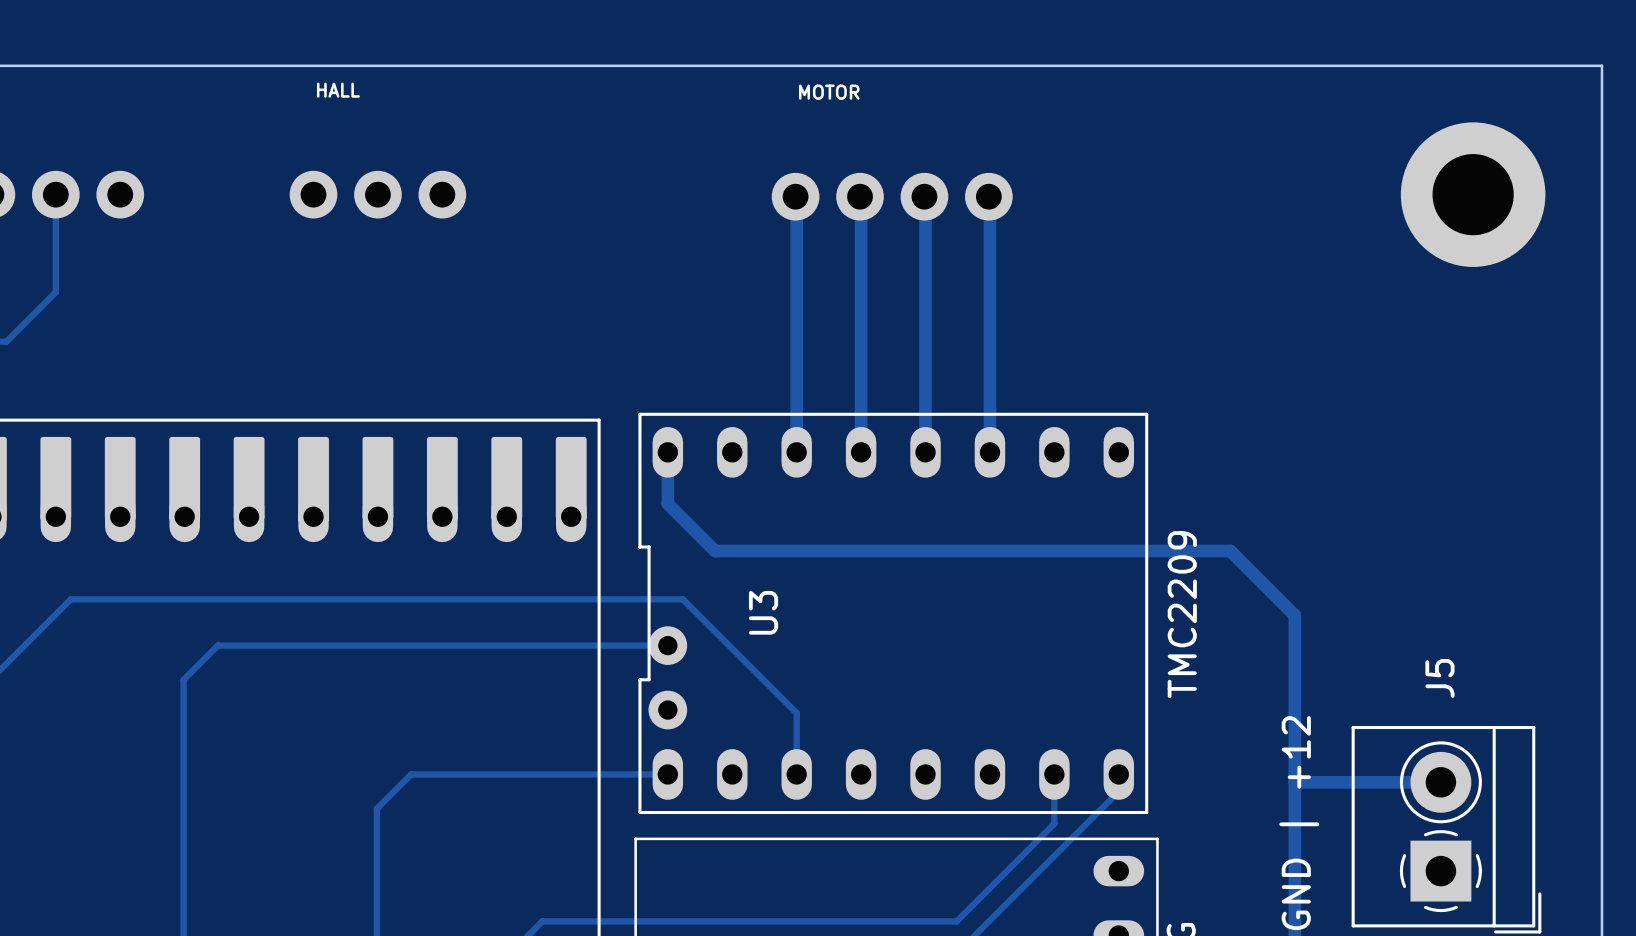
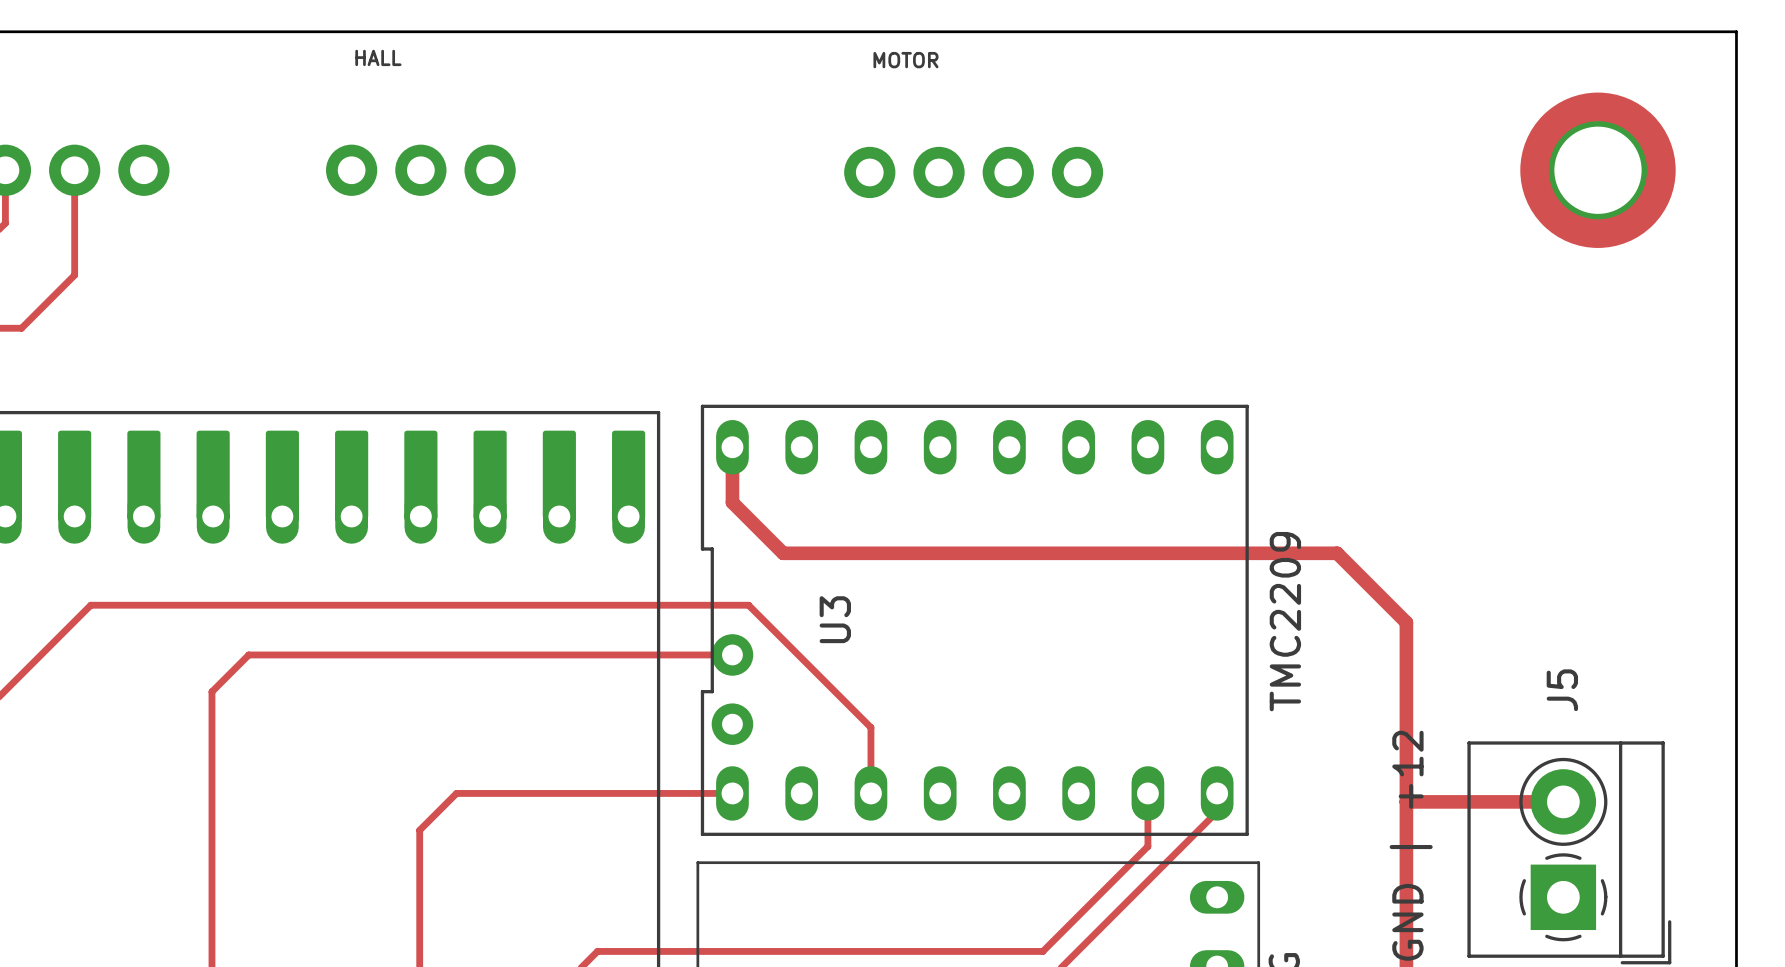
track: (796, 197) (796, 452) -> none
track: (861, 197) (861, 452) -> none
track: (925, 197) (925, 452) -> none
track: (989, 197) (989, 452) -> none

